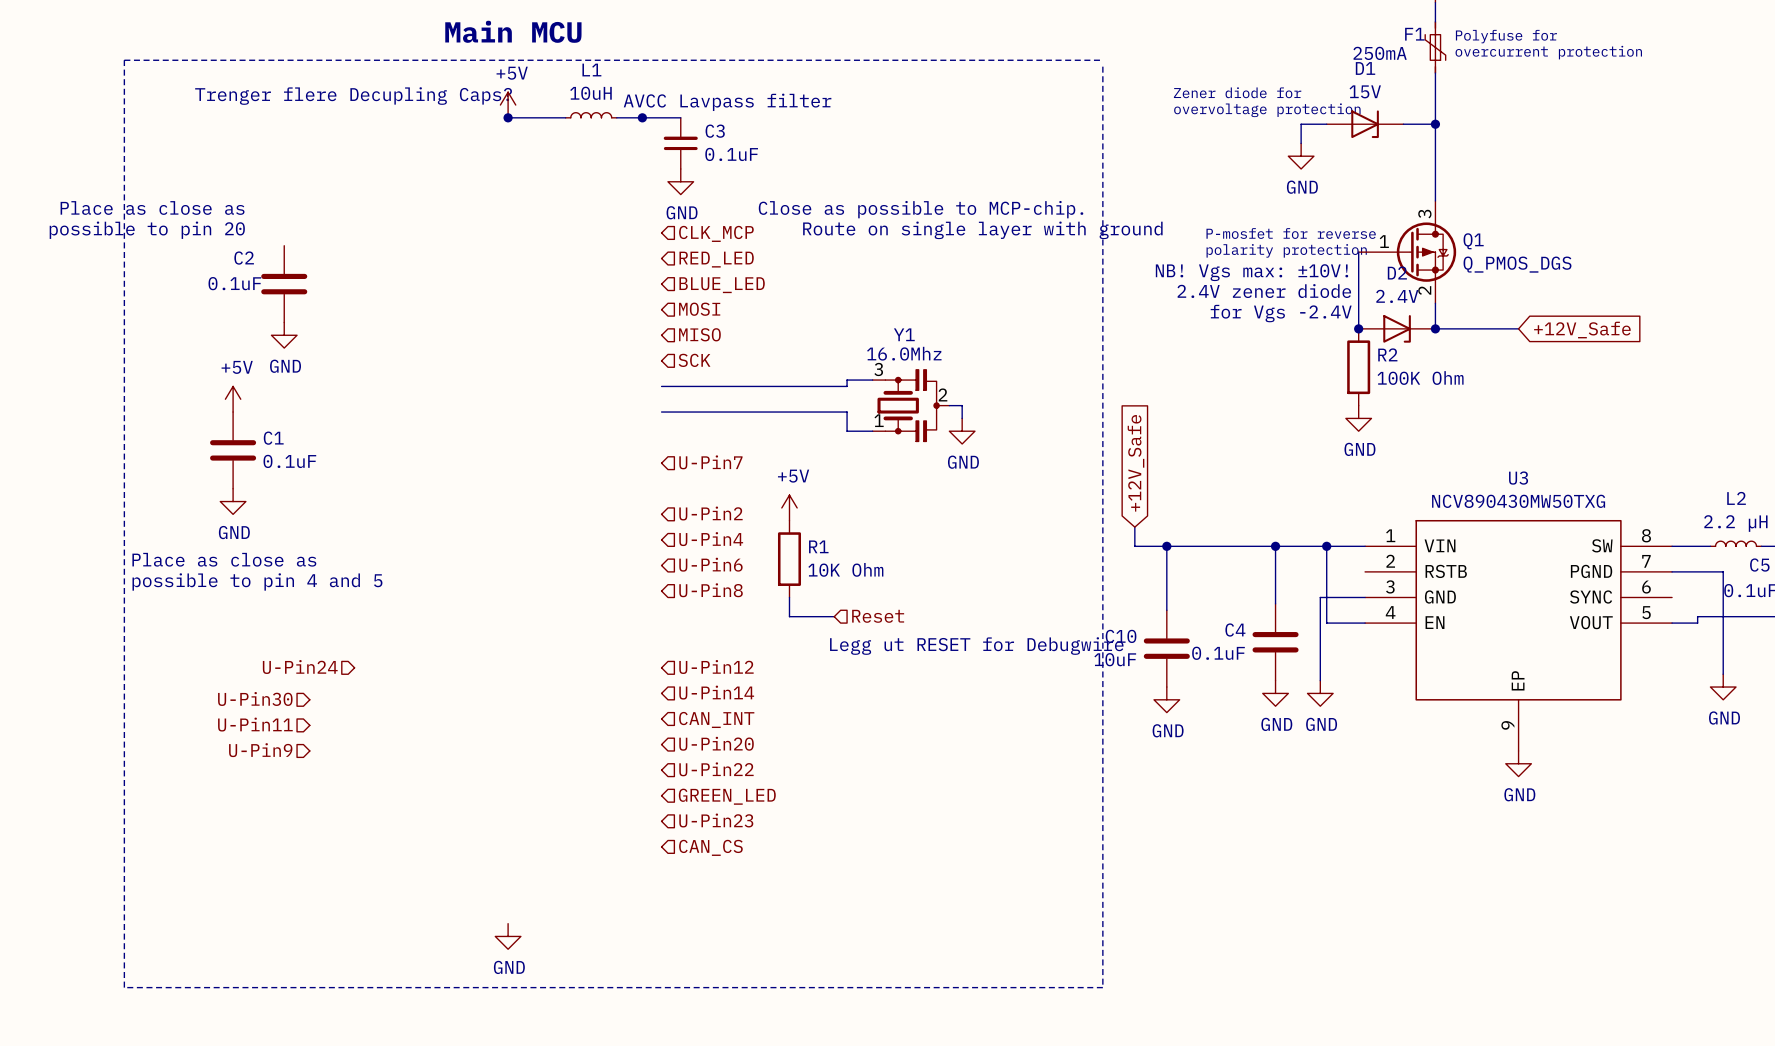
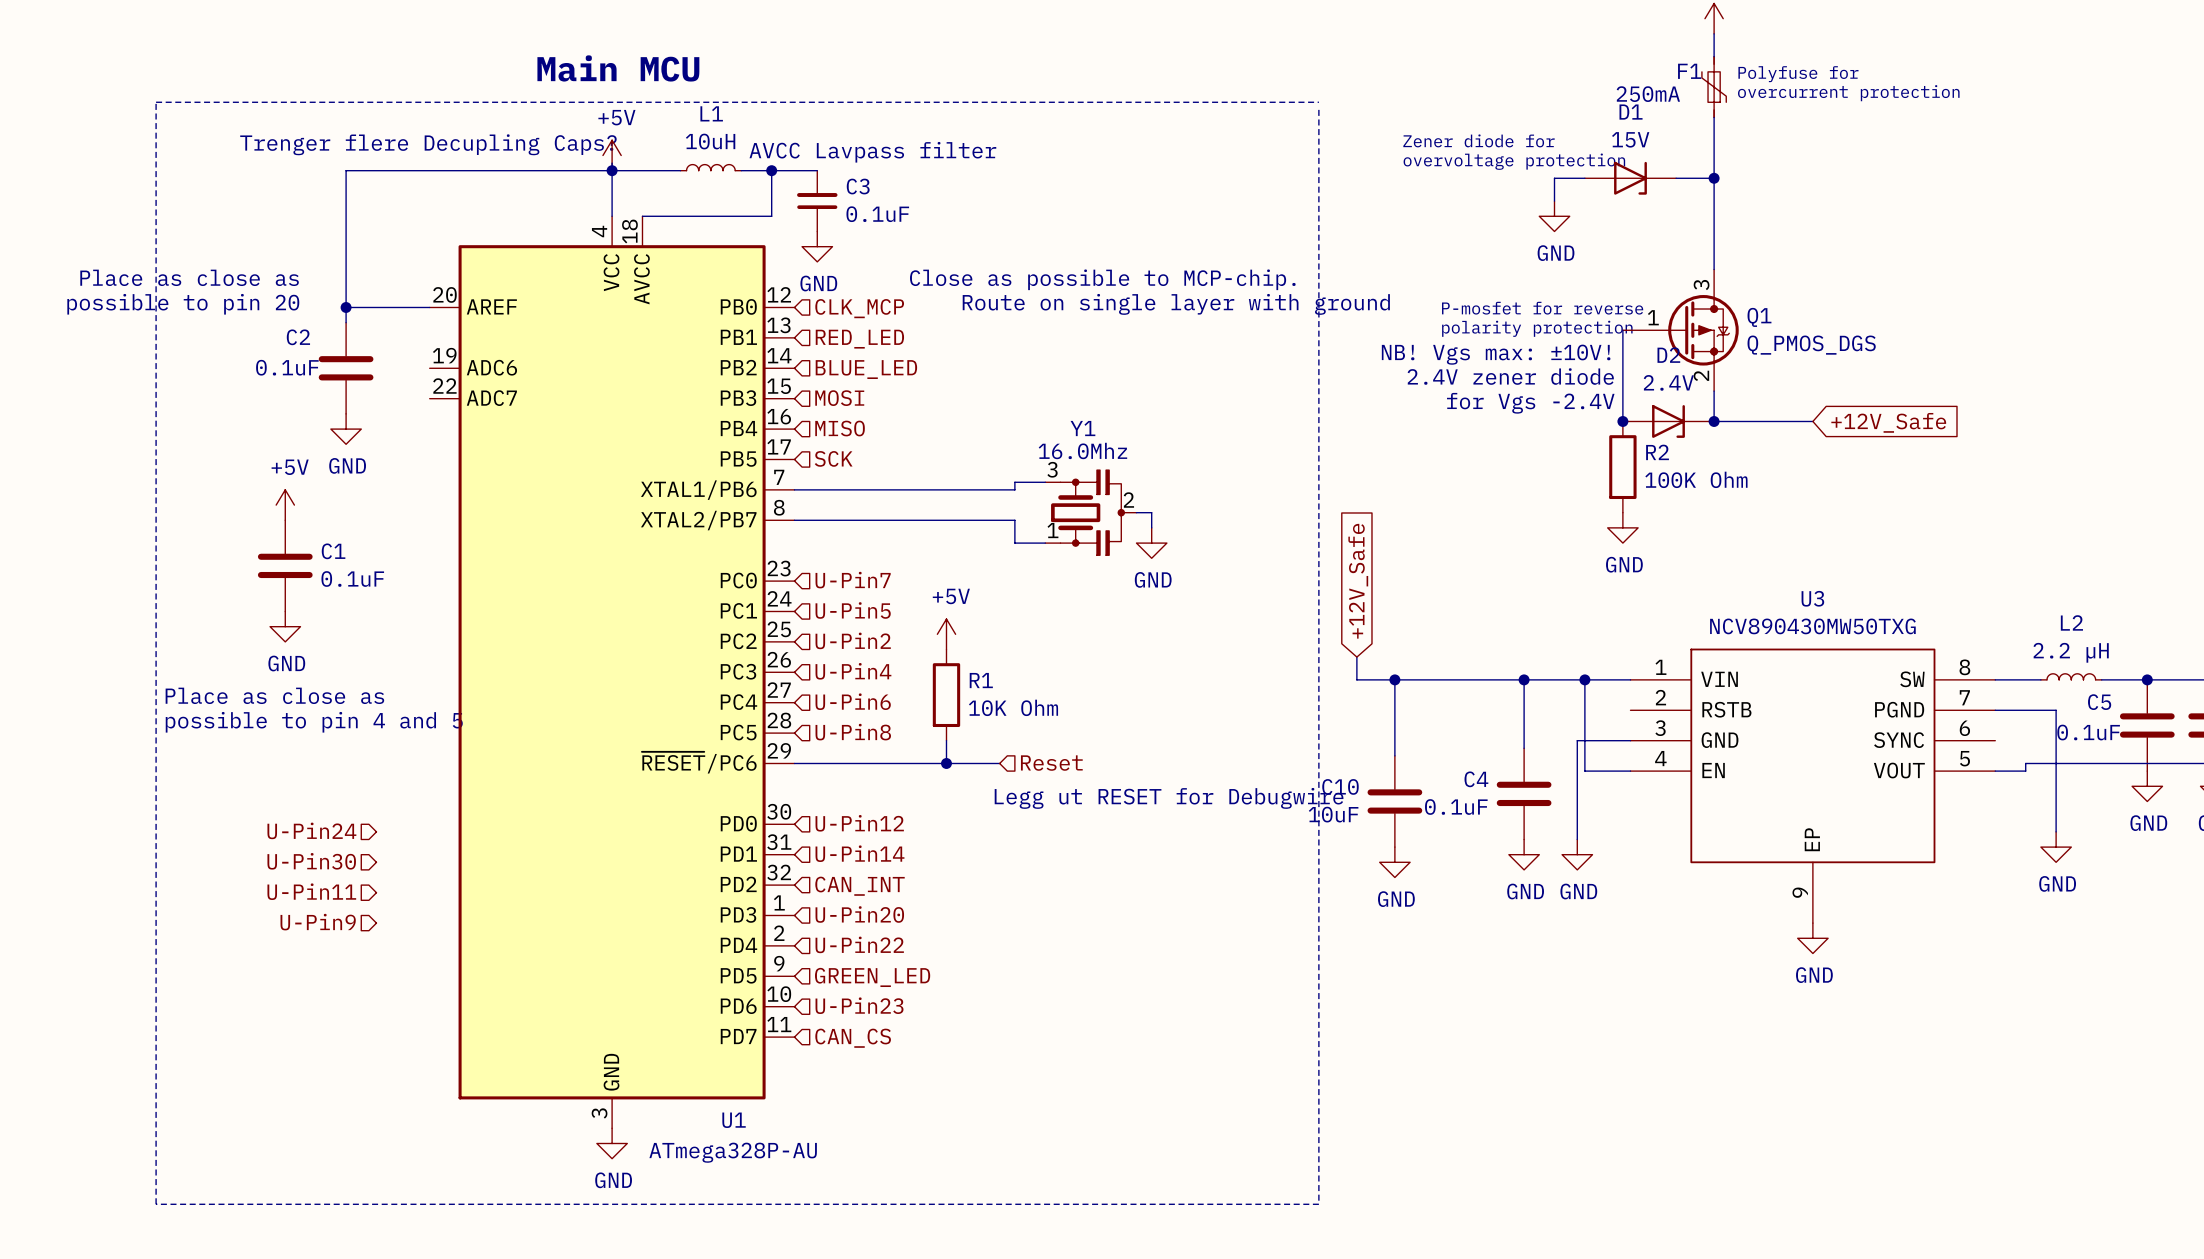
wire: none -> (612, 163) (612, 216)
wire: none -> (612, 170) (346, 170) (346, 322)
wire: none -> (771, 170) (771, 216) (642, 216)
wire: none -> (346, 307) (429, 307)
junction: none -> (346, 307)
hierarchical label: none -> U-Pin5 (853, 610)
U1: none -> ATmega328P-AU (612, 672)
wire: none -> (794, 763) (946, 763)
junction: none -> (946, 763)
hierarchical label position: U-Pin24 (300, 667) -> U-Pin24 (311, 830)

